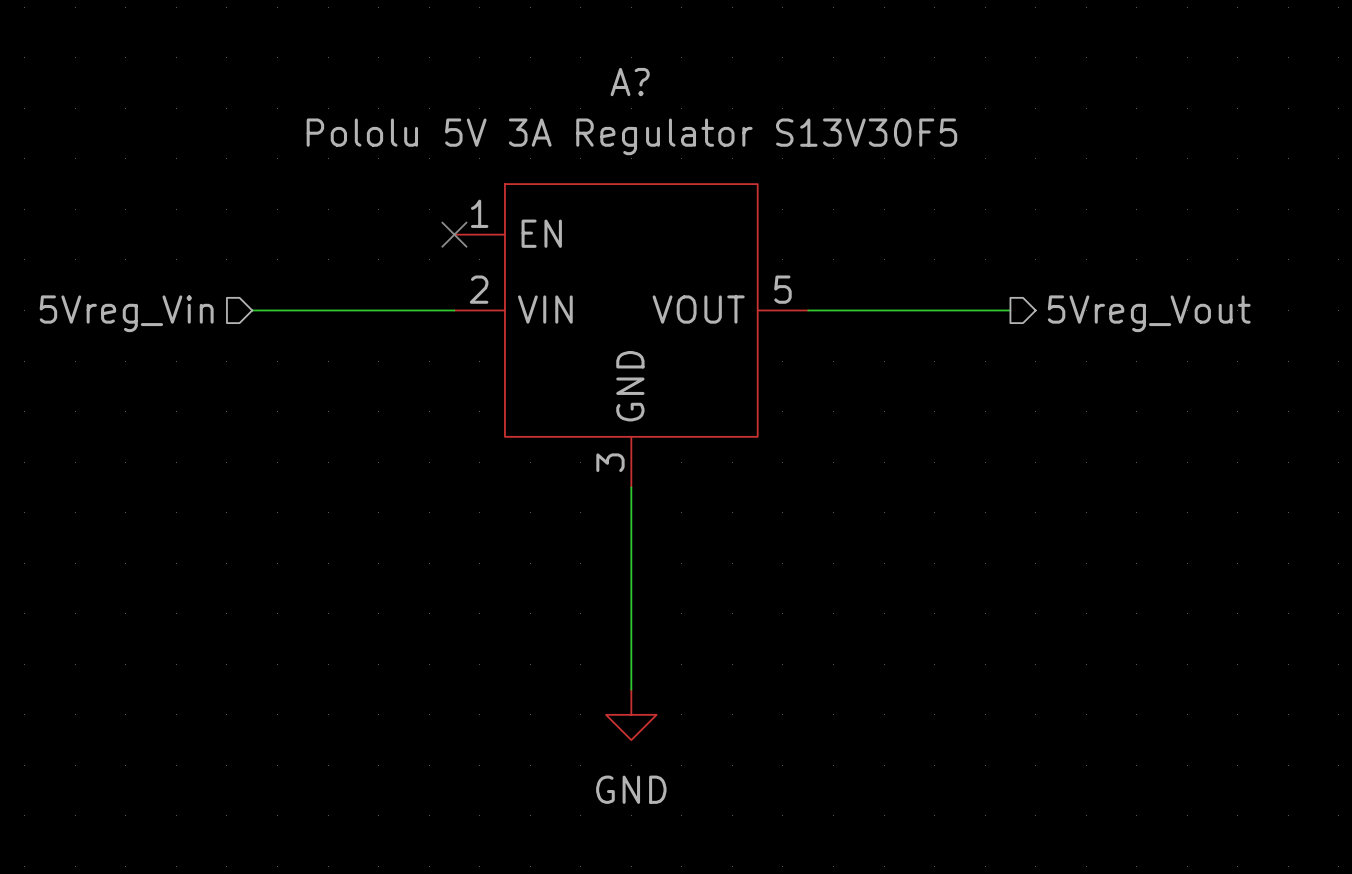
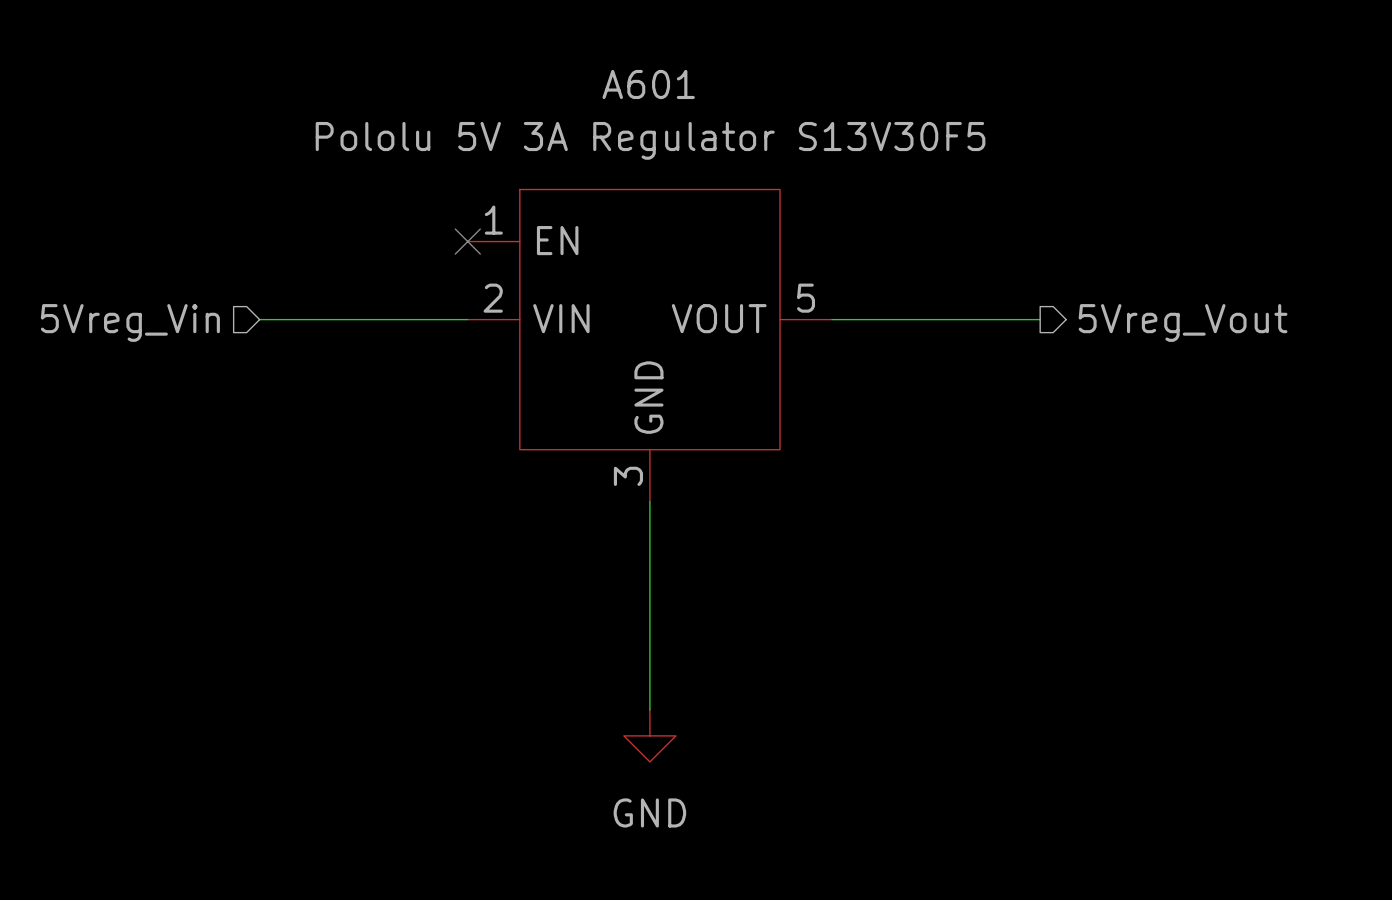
A? name: A? (630, 82) -> A601 (648, 84)

